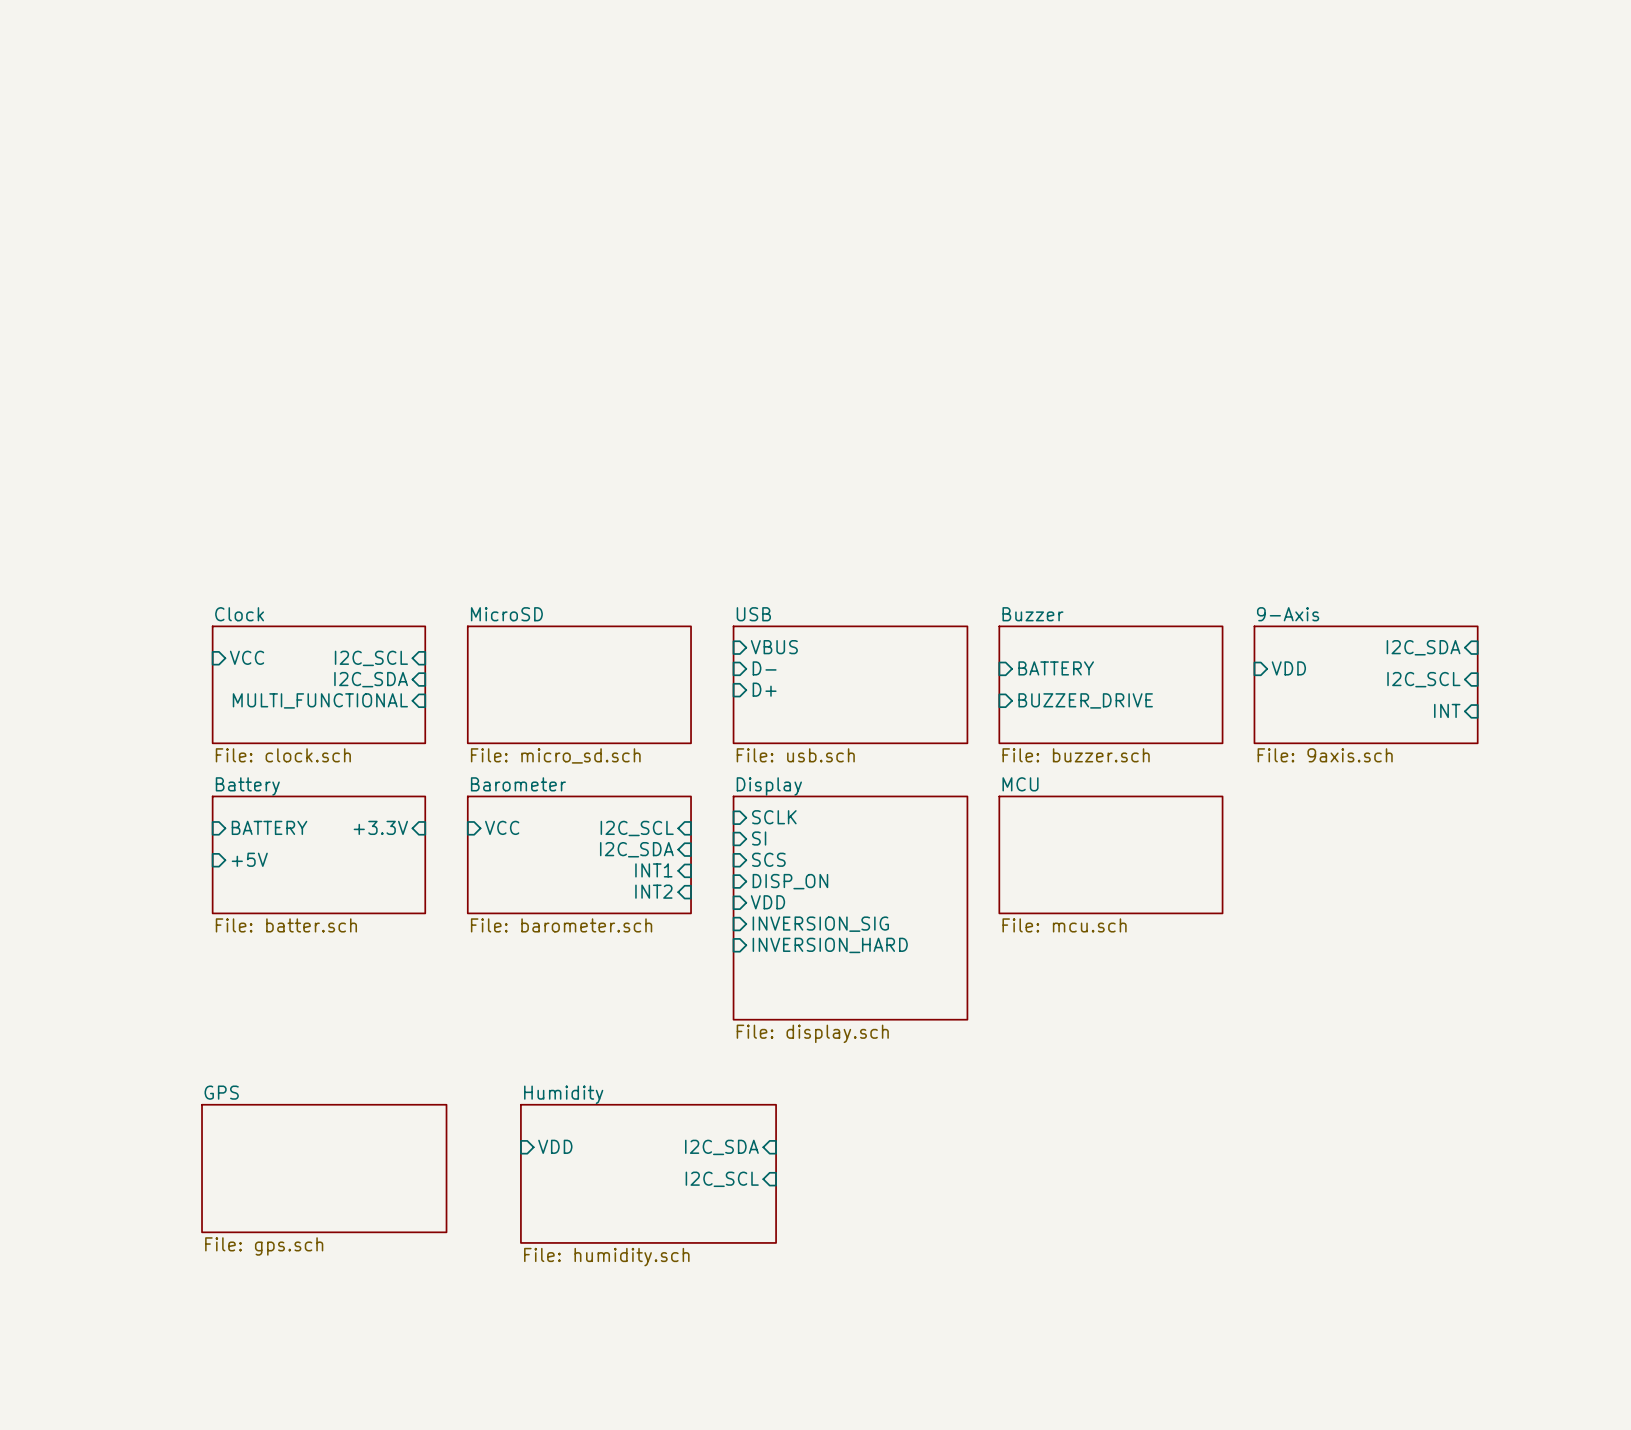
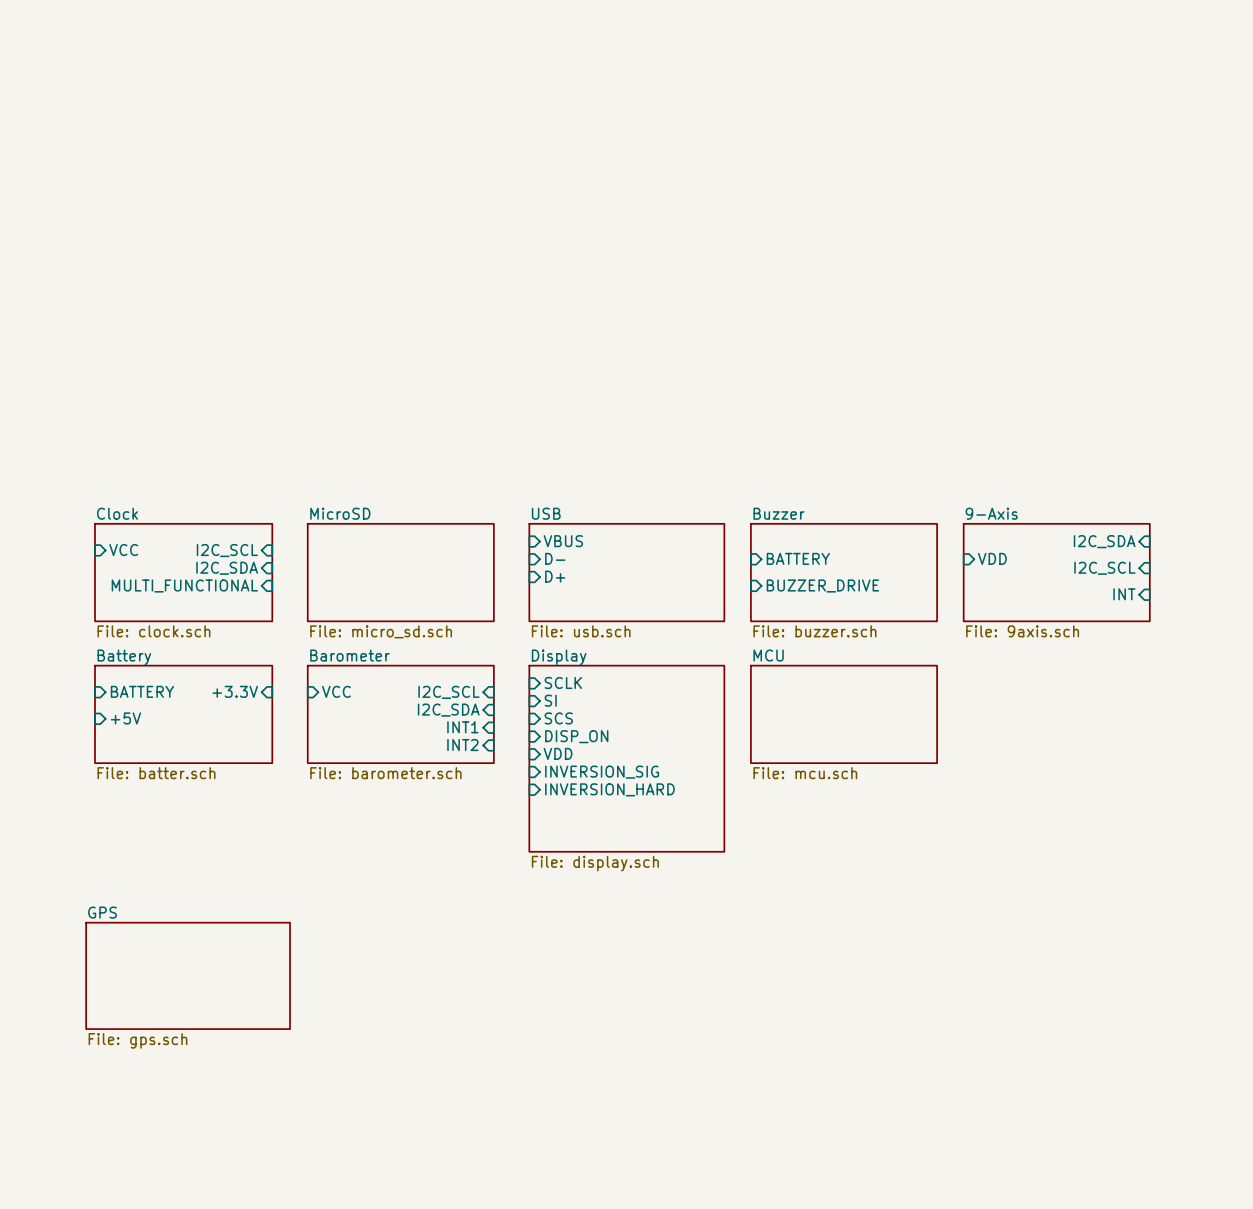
sheet pin: VDD (555, 1146) -> none
sheet pin: I2C_SDA (721, 1147) -> none
sheet Humidity: File: humidity.sch (648, 1173) -> none
sheet pin: I2C_SCL (722, 1179) -> none

